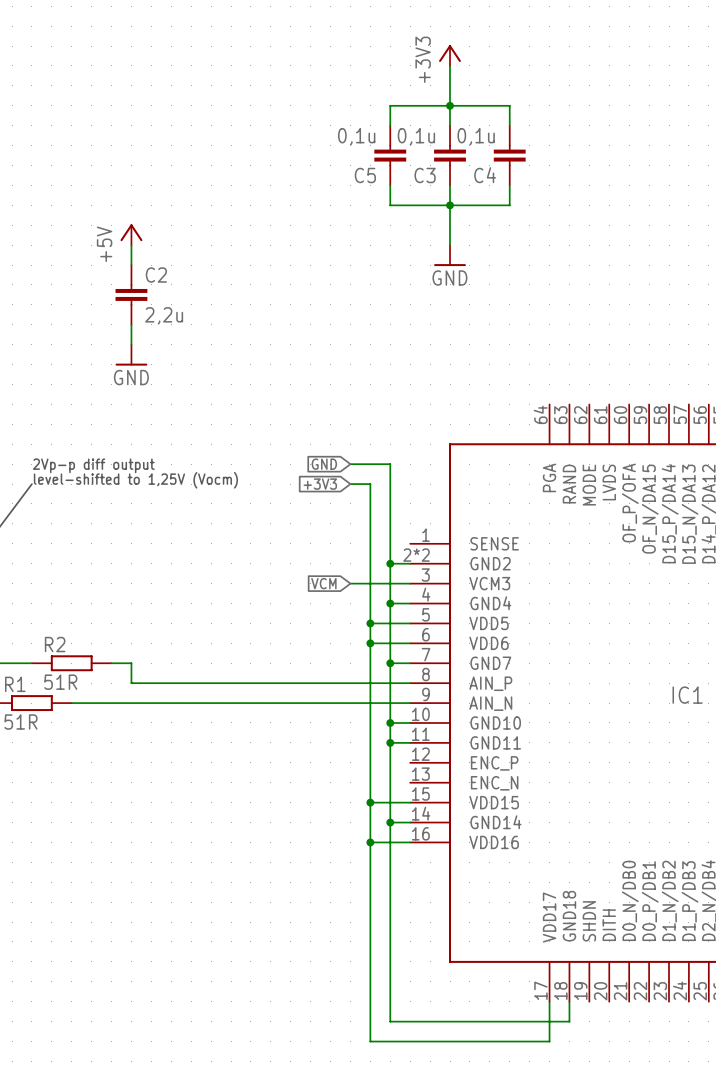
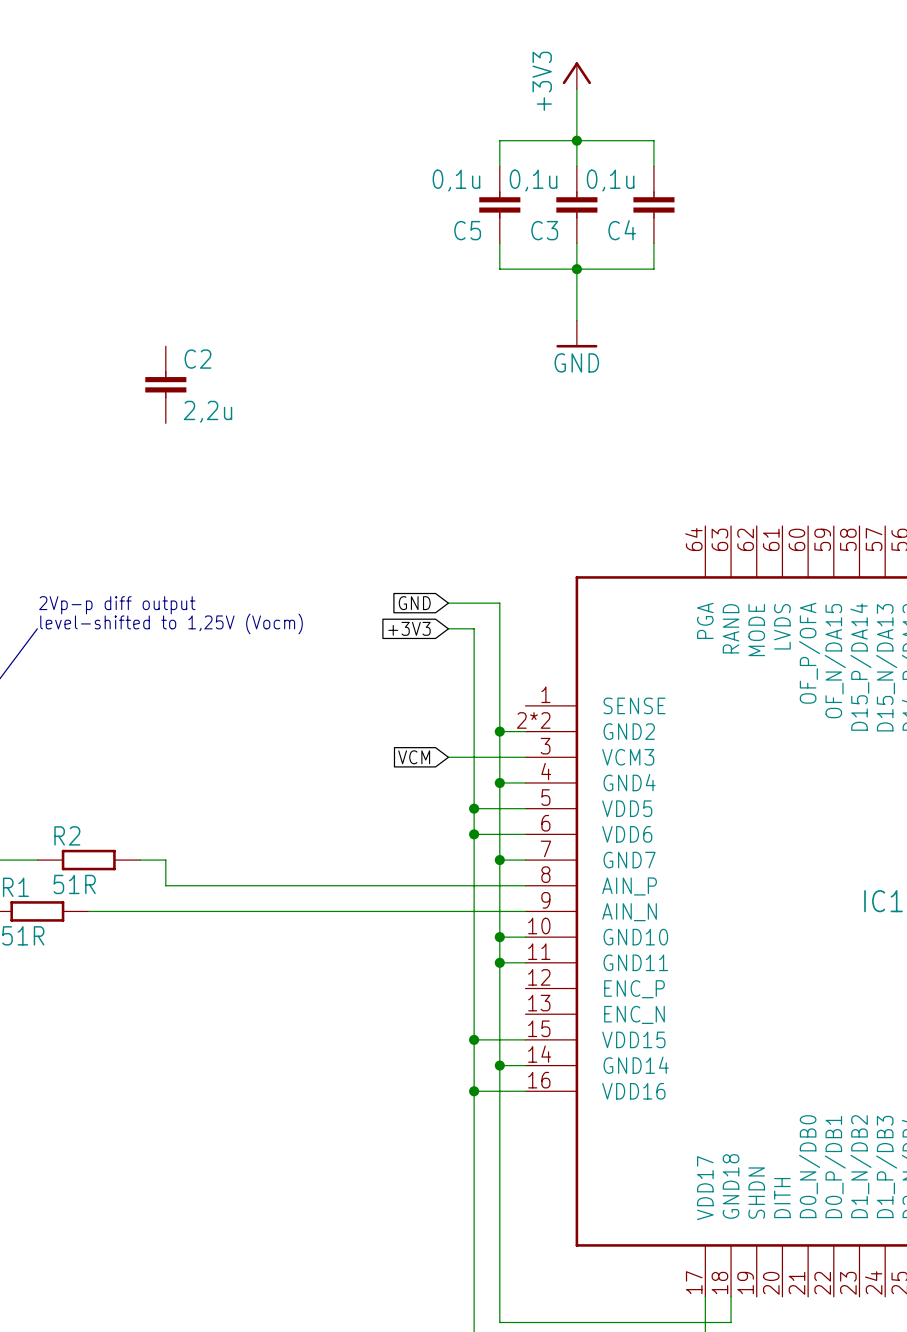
power symbol: +5V (131, 234) -> none
wire: (131, 245) (131, 265) -> none
wire: (131, 324) (131, 344) -> none
power symbol: GND (131, 355) -> none

